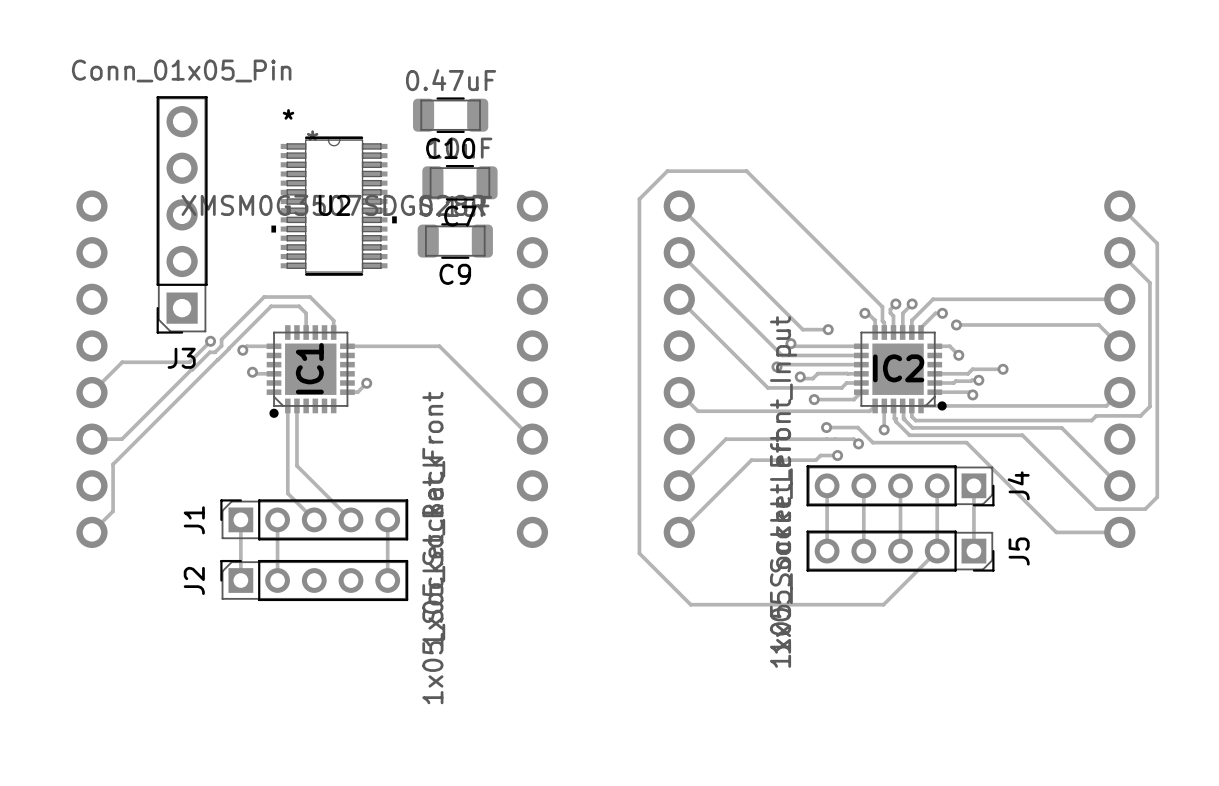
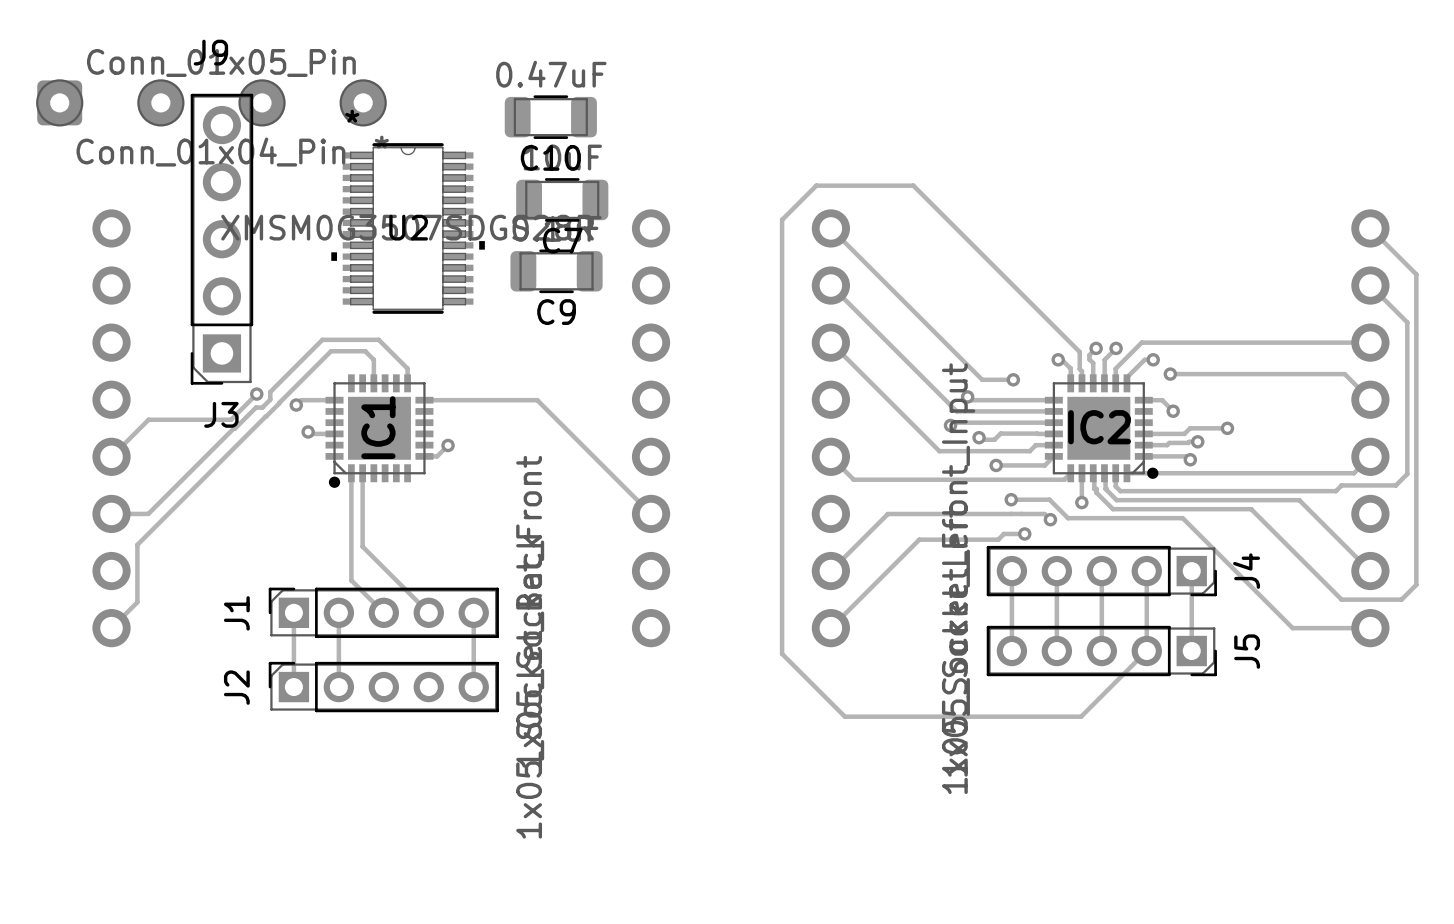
J9: none -> Conn_01x04_Pin (211, 102)

